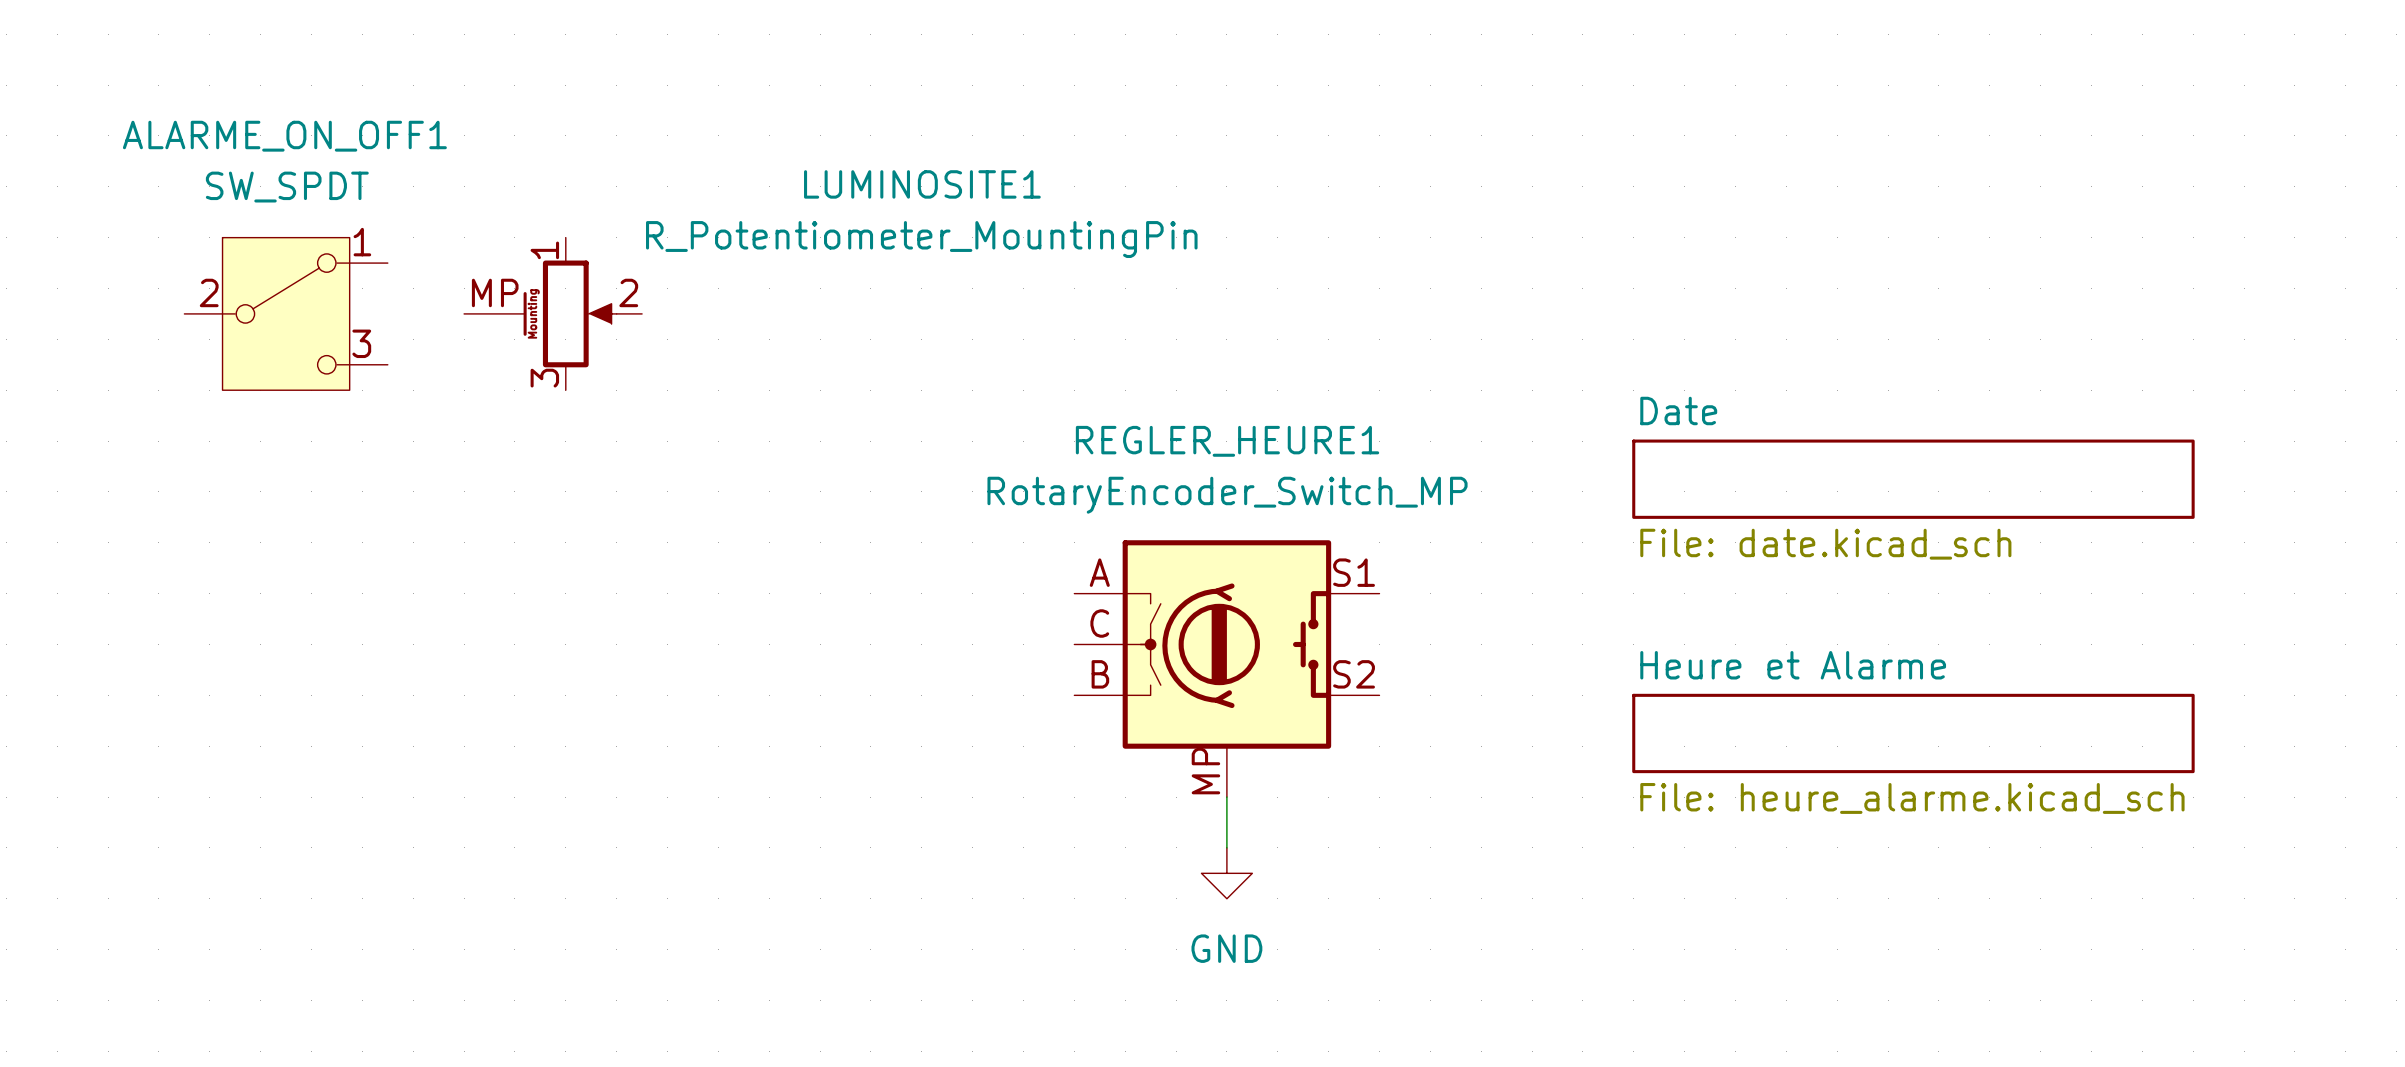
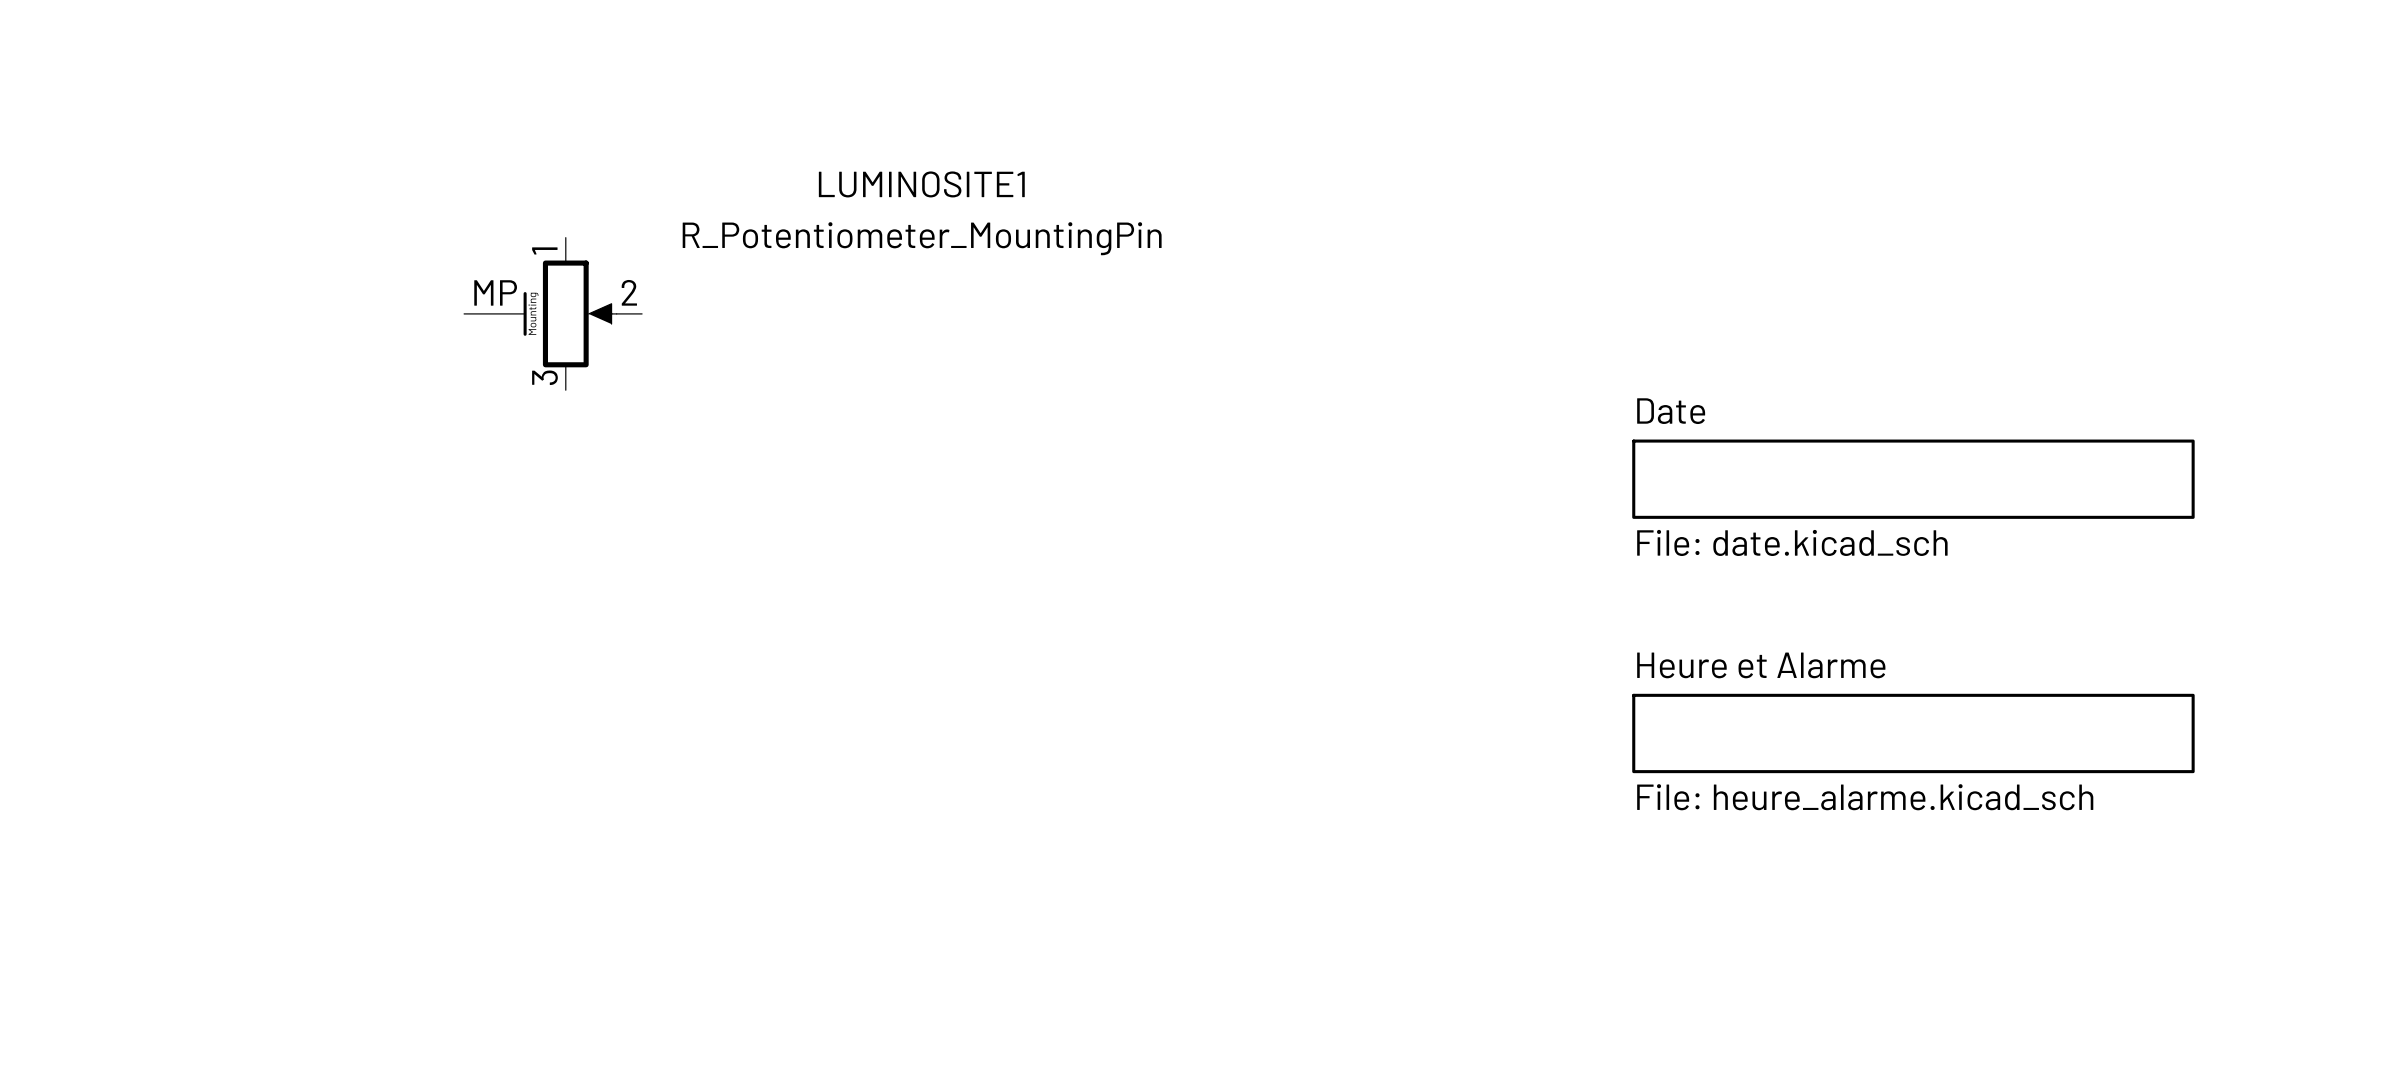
ALARME_ON_OFF1: SW_SPDT (286, 313) -> none
REGLER_HEURE1: RotaryEncoder_Switch_MP (1226, 668) -> none
wire: (1226, 797) (1226, 847) -> none
power symbol: GND (1226, 873) -> none

